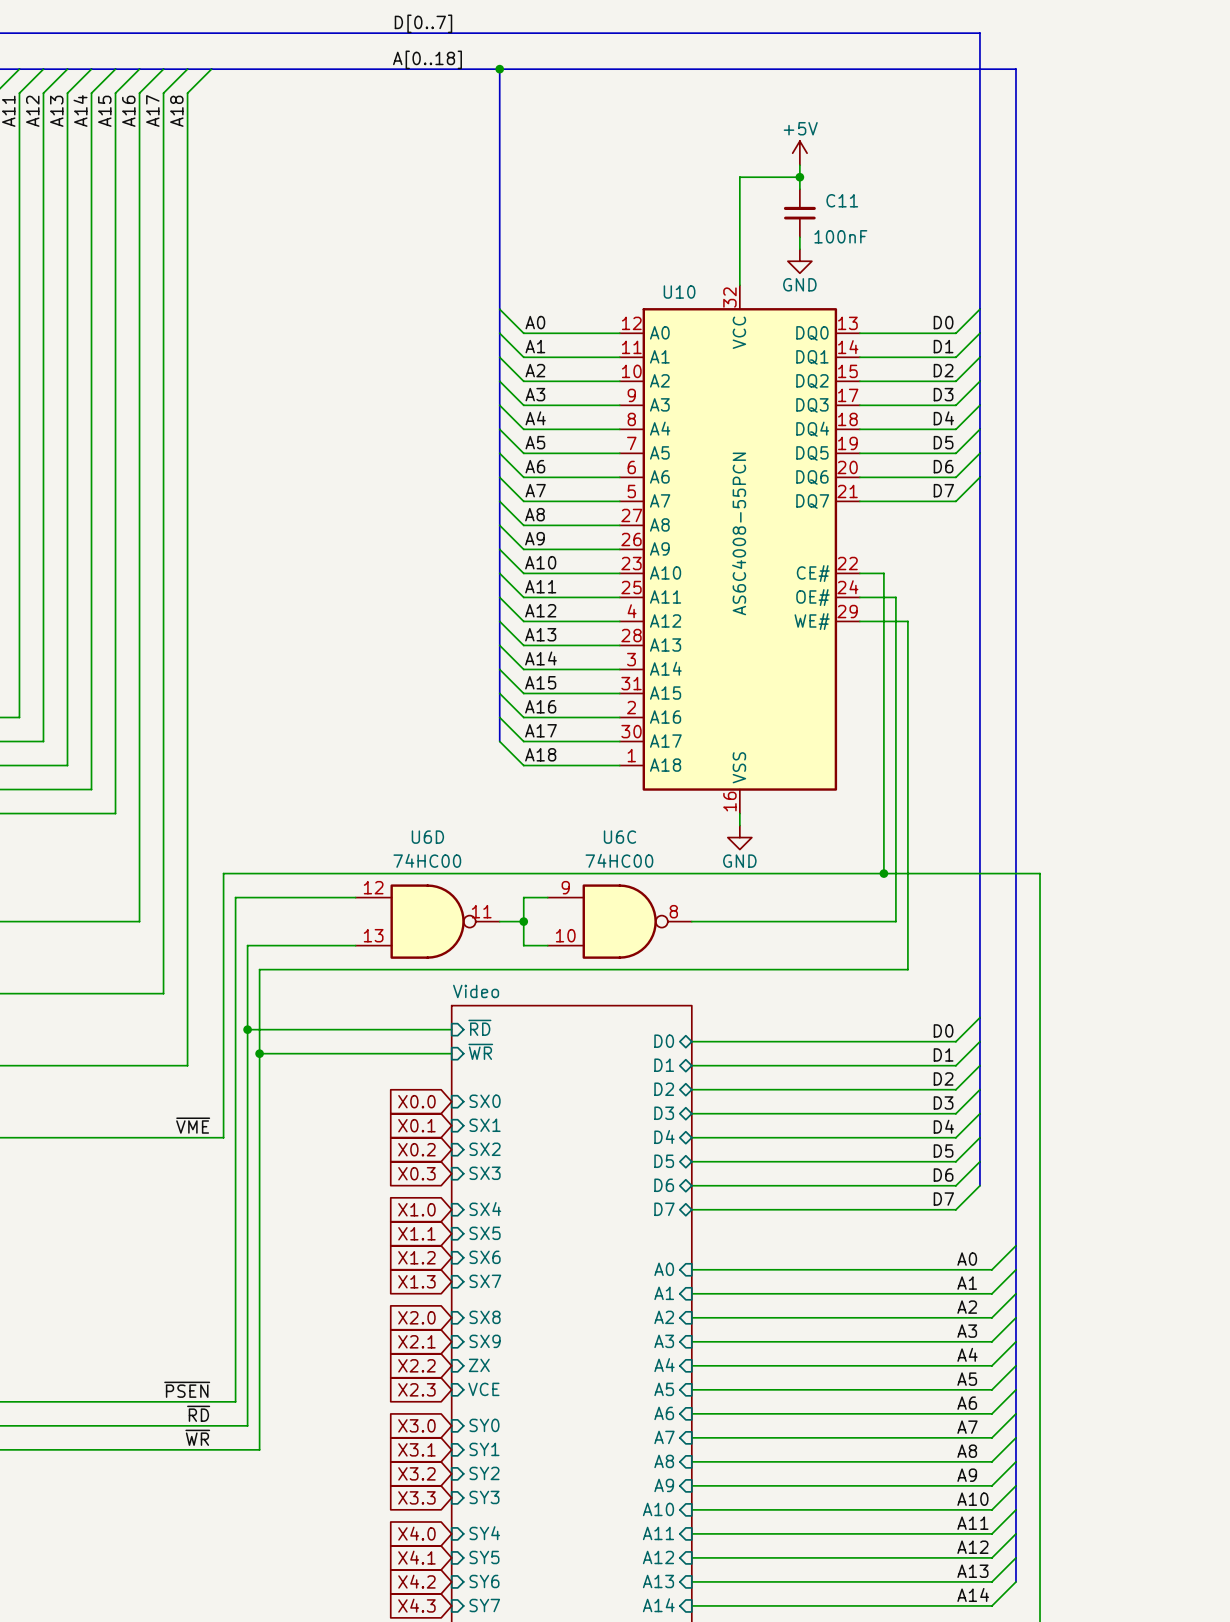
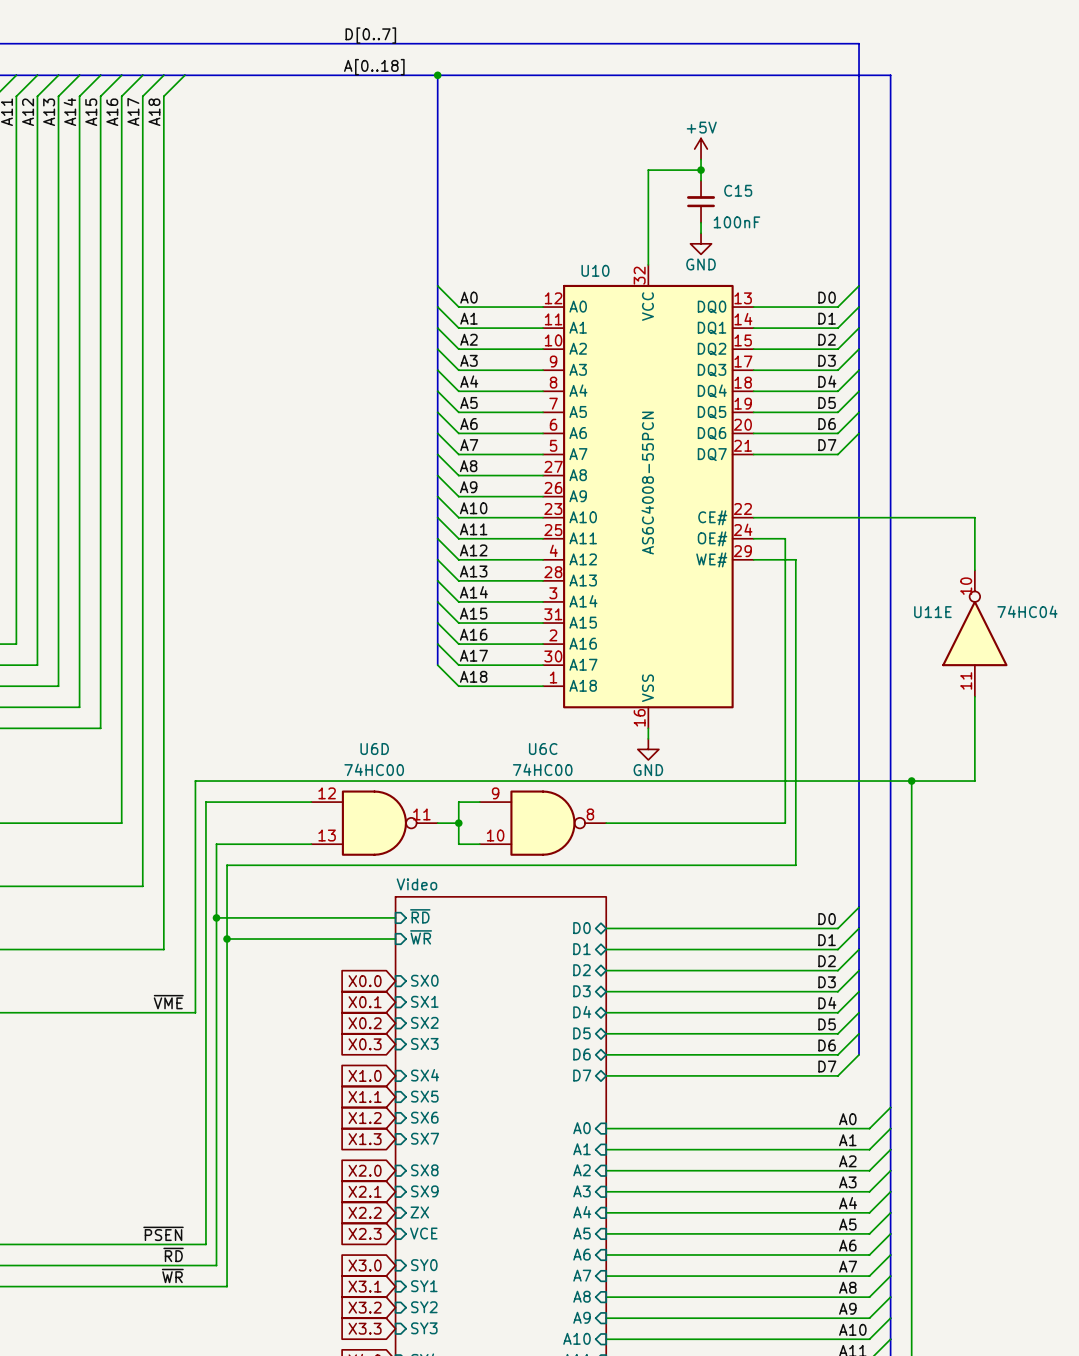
C11 name: C11 (842, 200) -> C15 (738, 190)
wire: (883, 573) (883, 873) -> (774, 517) (974, 517) (974, 570)
U11E: none -> 74HC04 (974, 633)
wire: none -> (974, 696) (974, 781) (911, 781)
junction: (883, 873) -> none
junction: none -> (911, 781)

